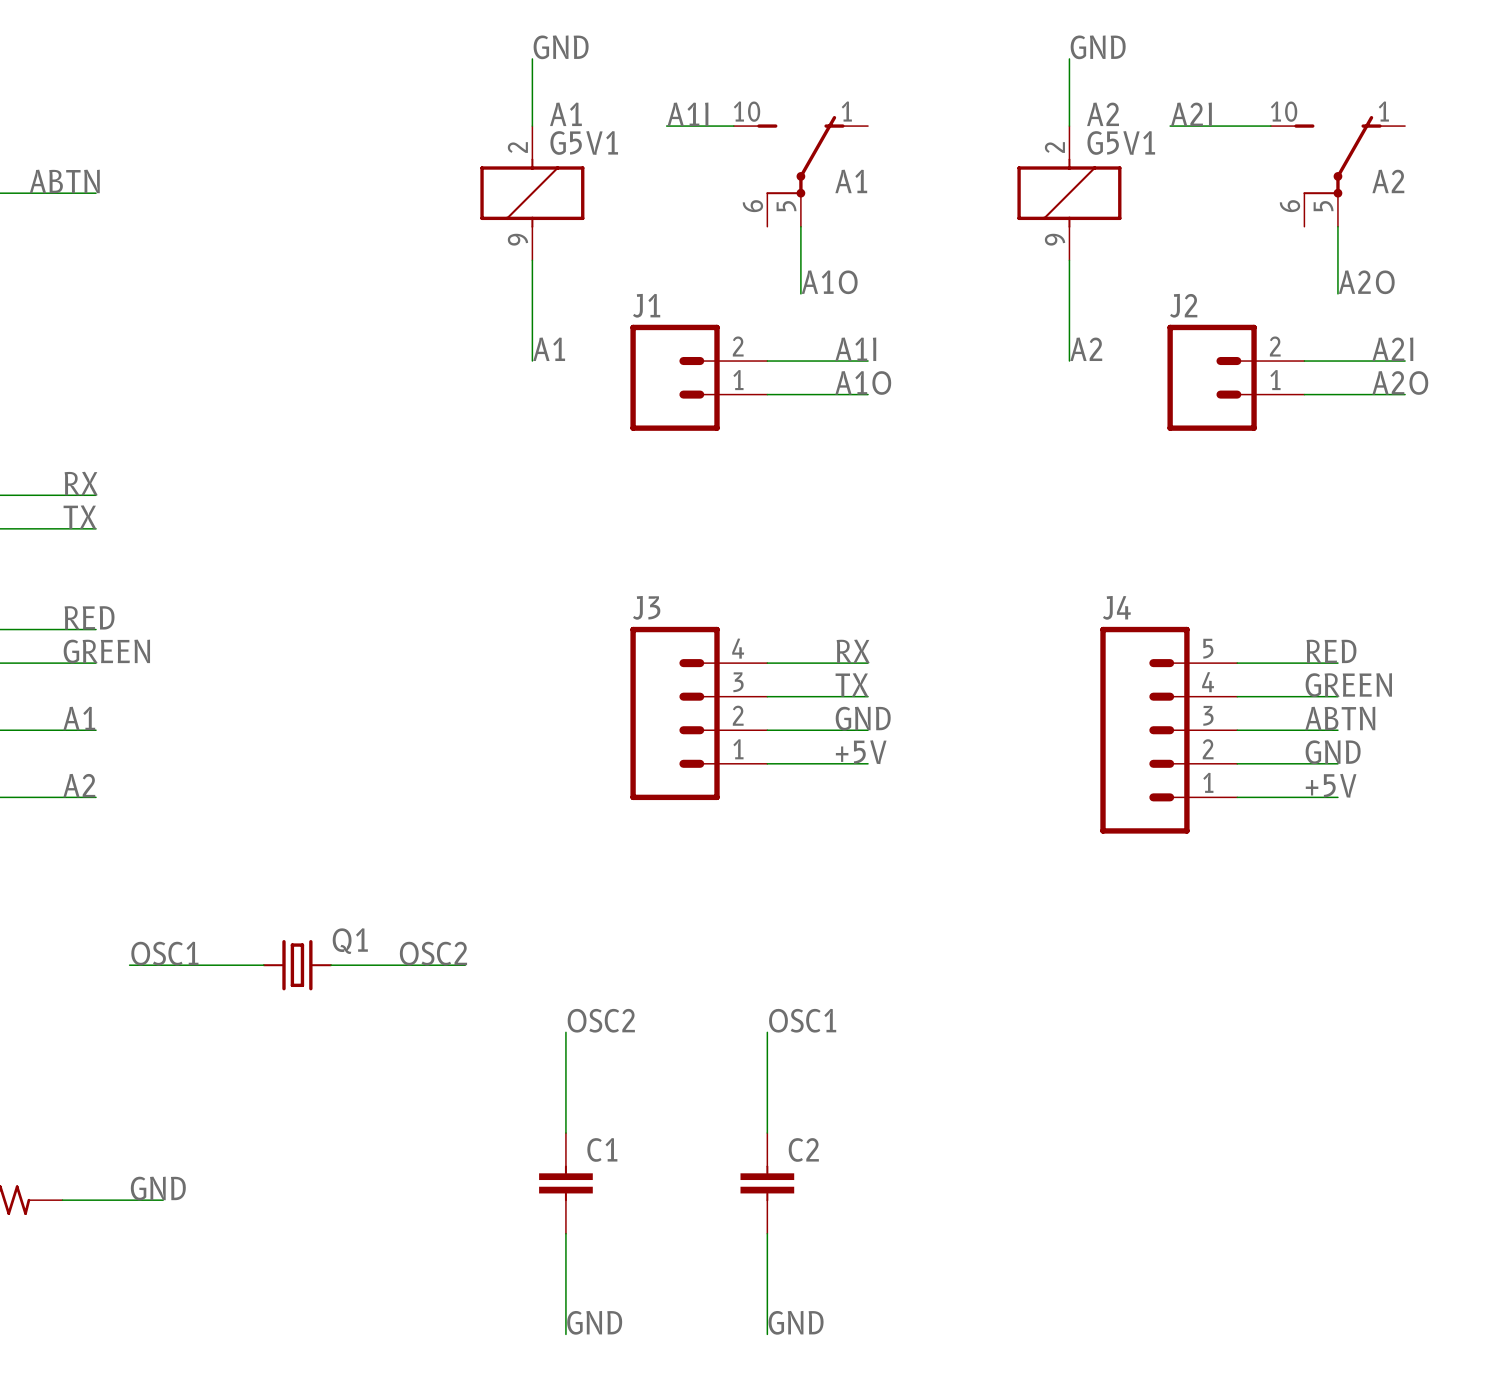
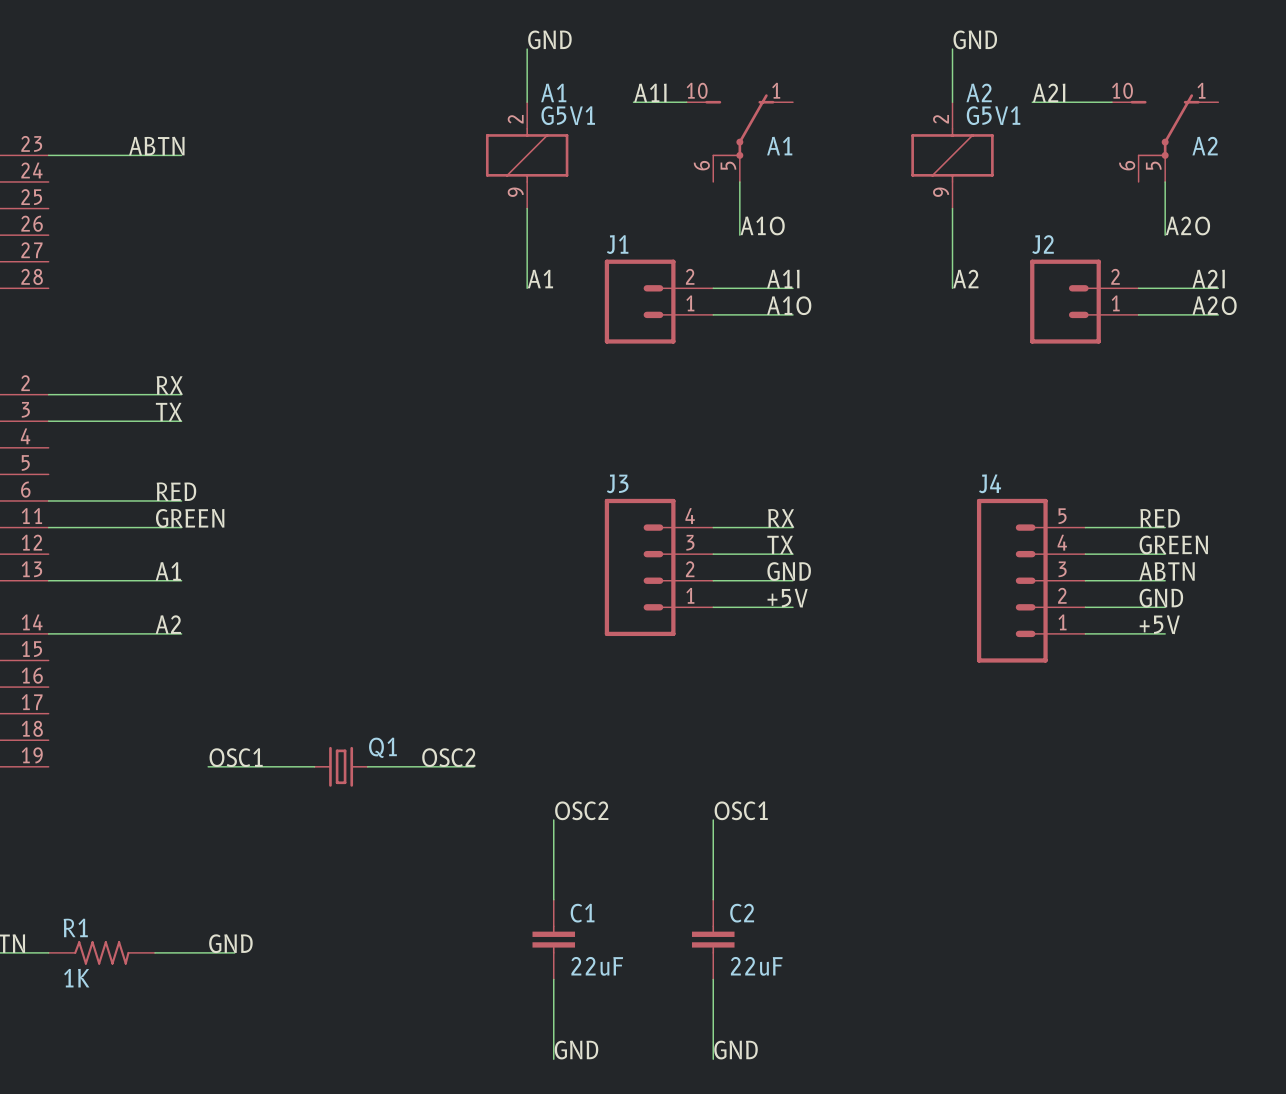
C1 value: none -> 22uF (597, 966)
C2 value: none -> 22uF (756, 966)

